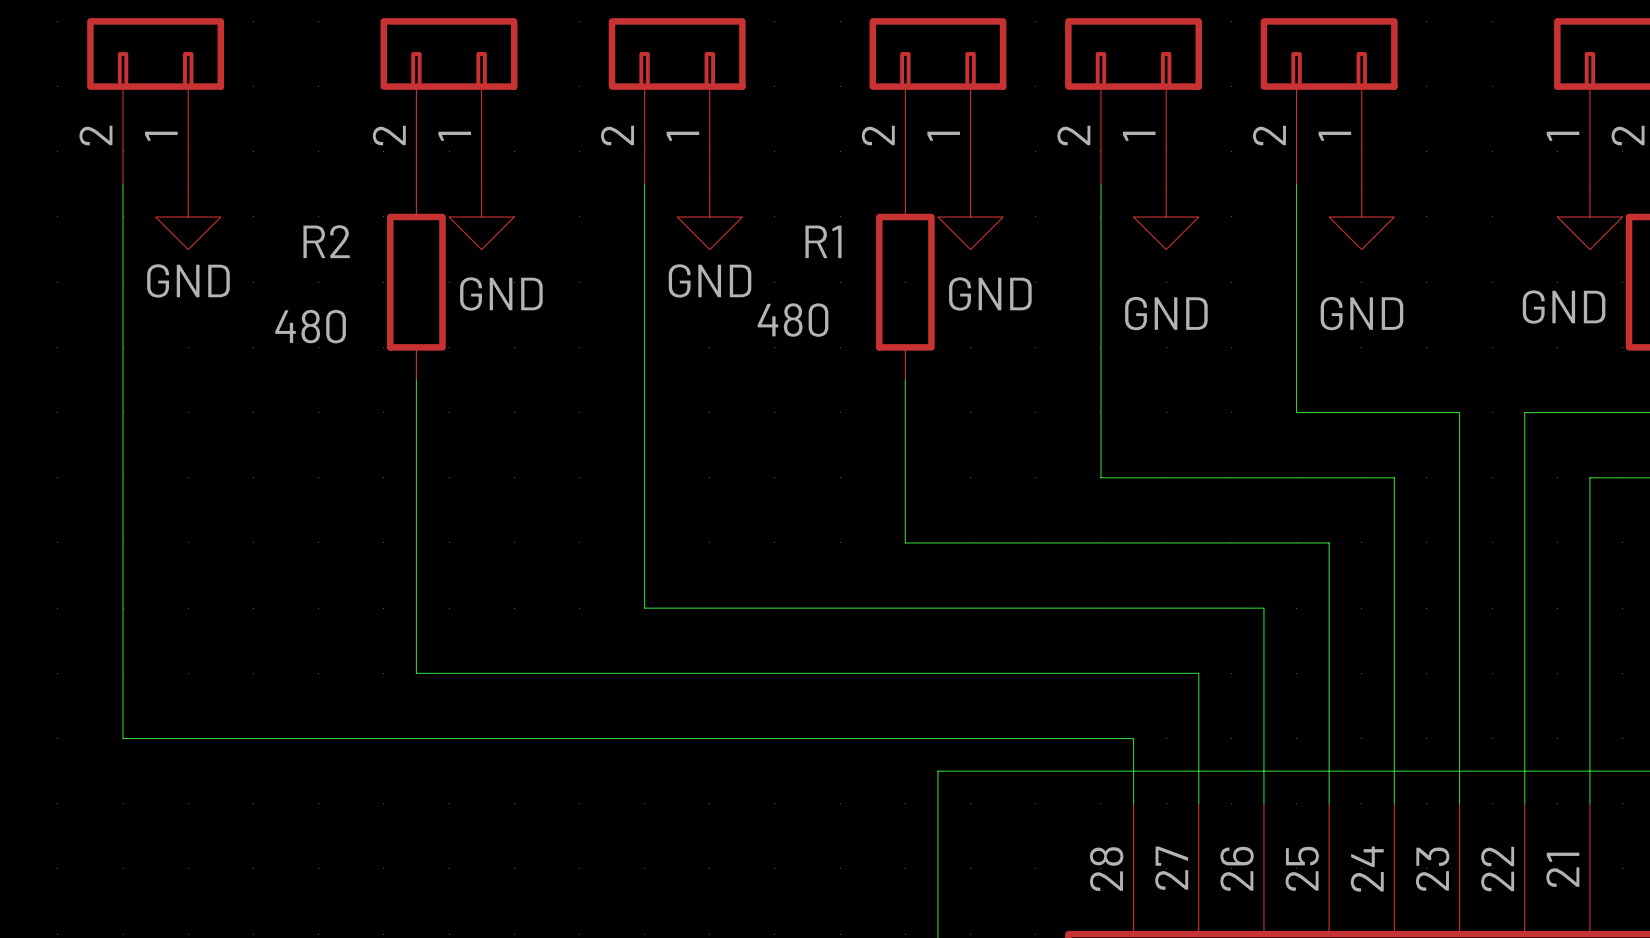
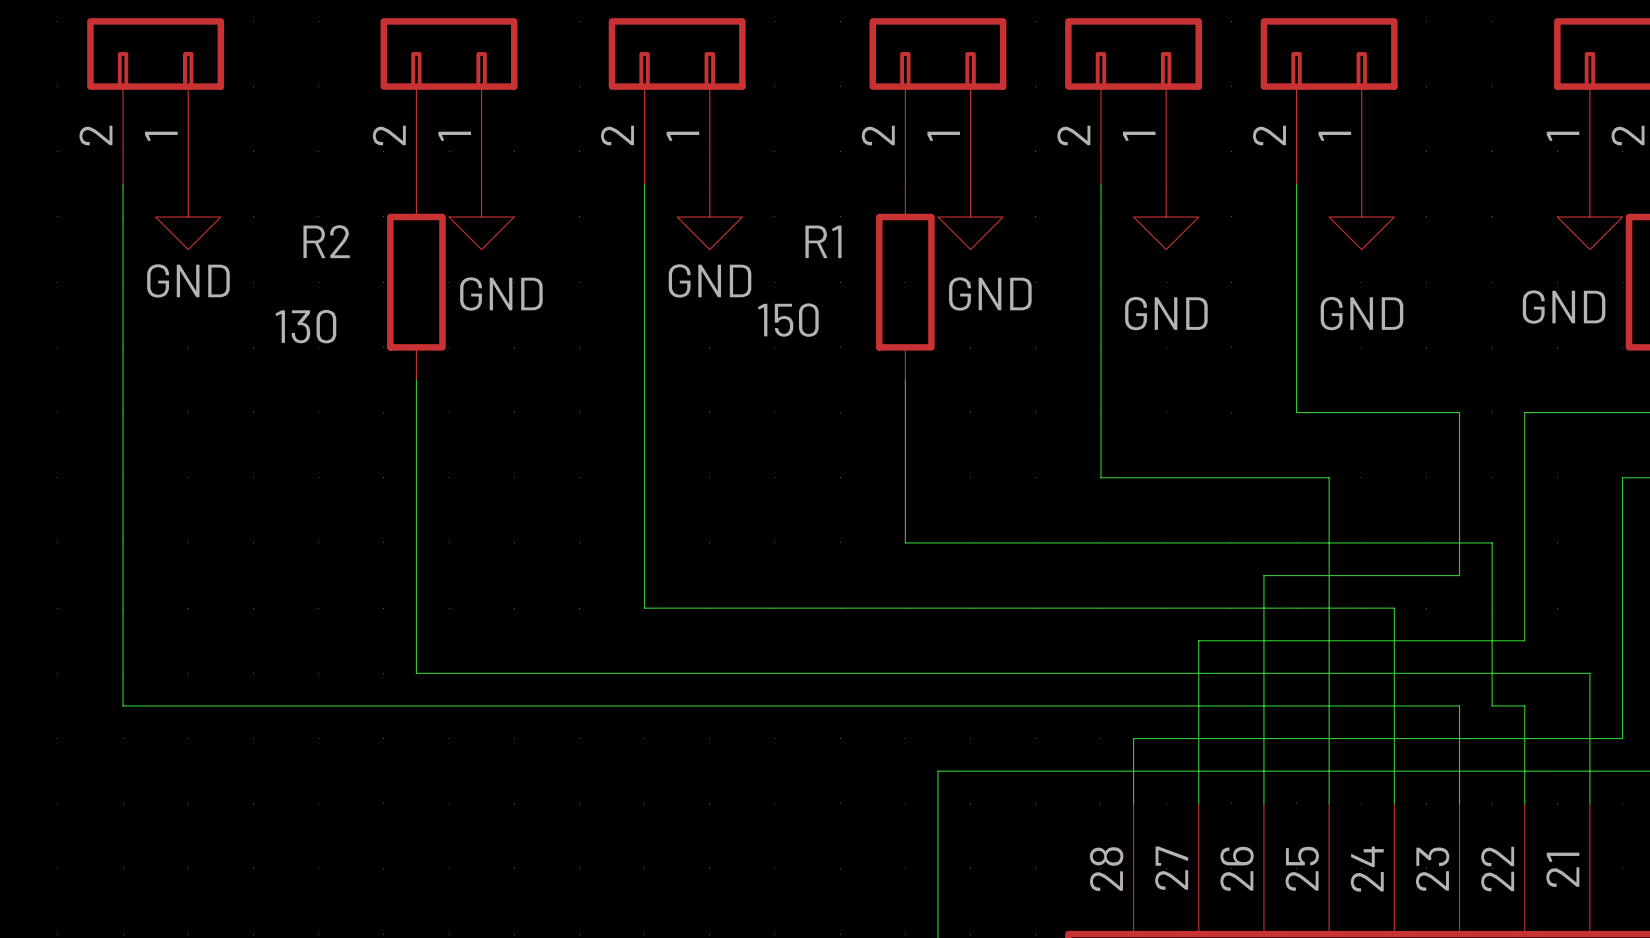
R1 value: 480 (793, 320) -> 150 (788, 320)
R2 value: 480 (310, 326) -> 130 (305, 326)
wire: (1329, 477) (1394, 477) (1394, 608) -> (1329, 477) (1329, 542) (1492, 542) (1492, 705) (1524, 705)
wire: (1622, 477) (1589, 477) (1589, 673) -> (1622, 477) (1622, 738) (1133, 738)
wire: (1459, 575) (1459, 705) -> (1459, 575) (1263, 575) (1263, 608) (1394, 608)
wire: (1524, 640) (1524, 705) -> (1524, 640) (1198, 640) (1198, 673) (1589, 673)
wire: (123, 705) (123, 738) (1133, 738) -> (123, 705) (1459, 705)

